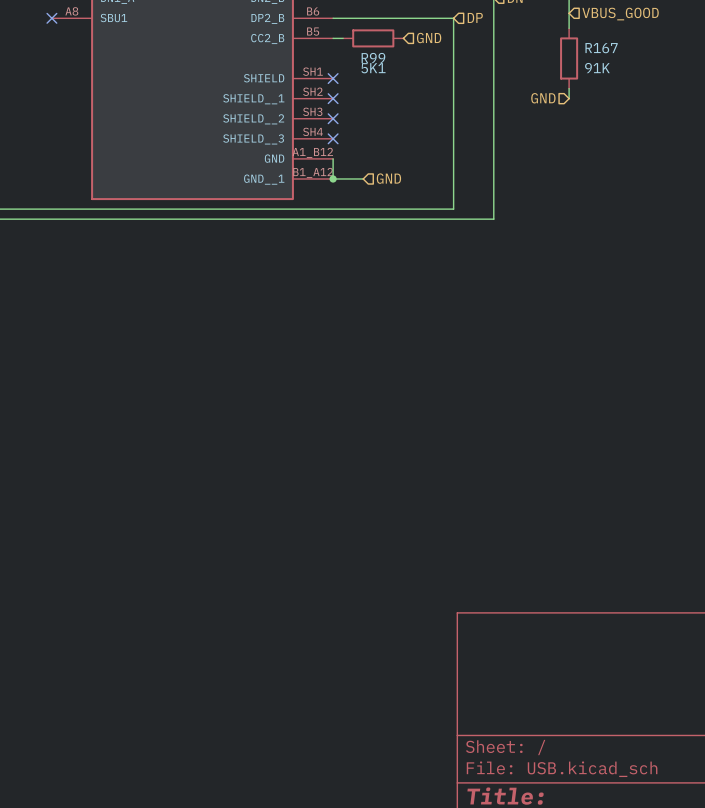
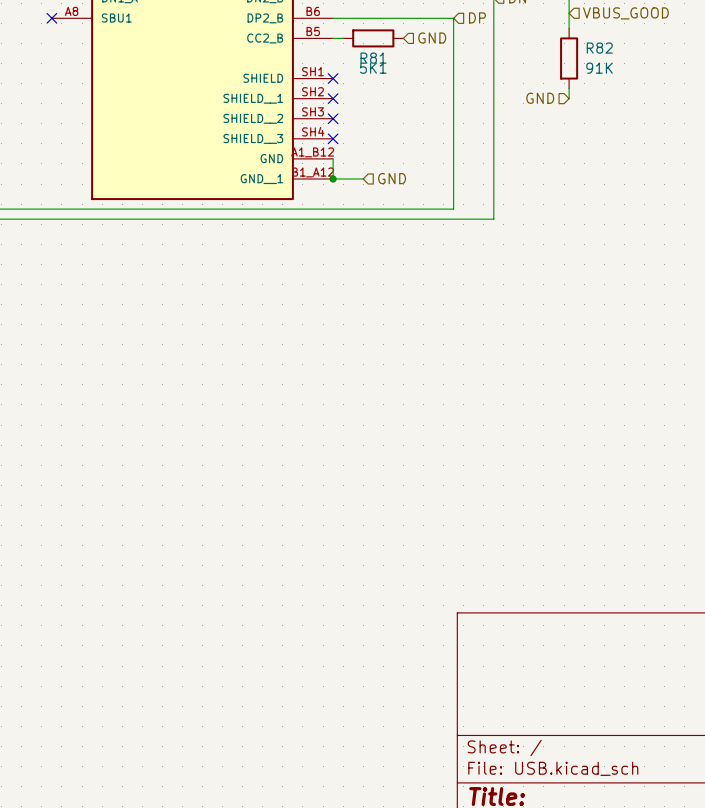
R167 name: R167 (601, 48) -> R82 (599, 48)
R99 name: R99 (373, 58) -> R81 (373, 58)

